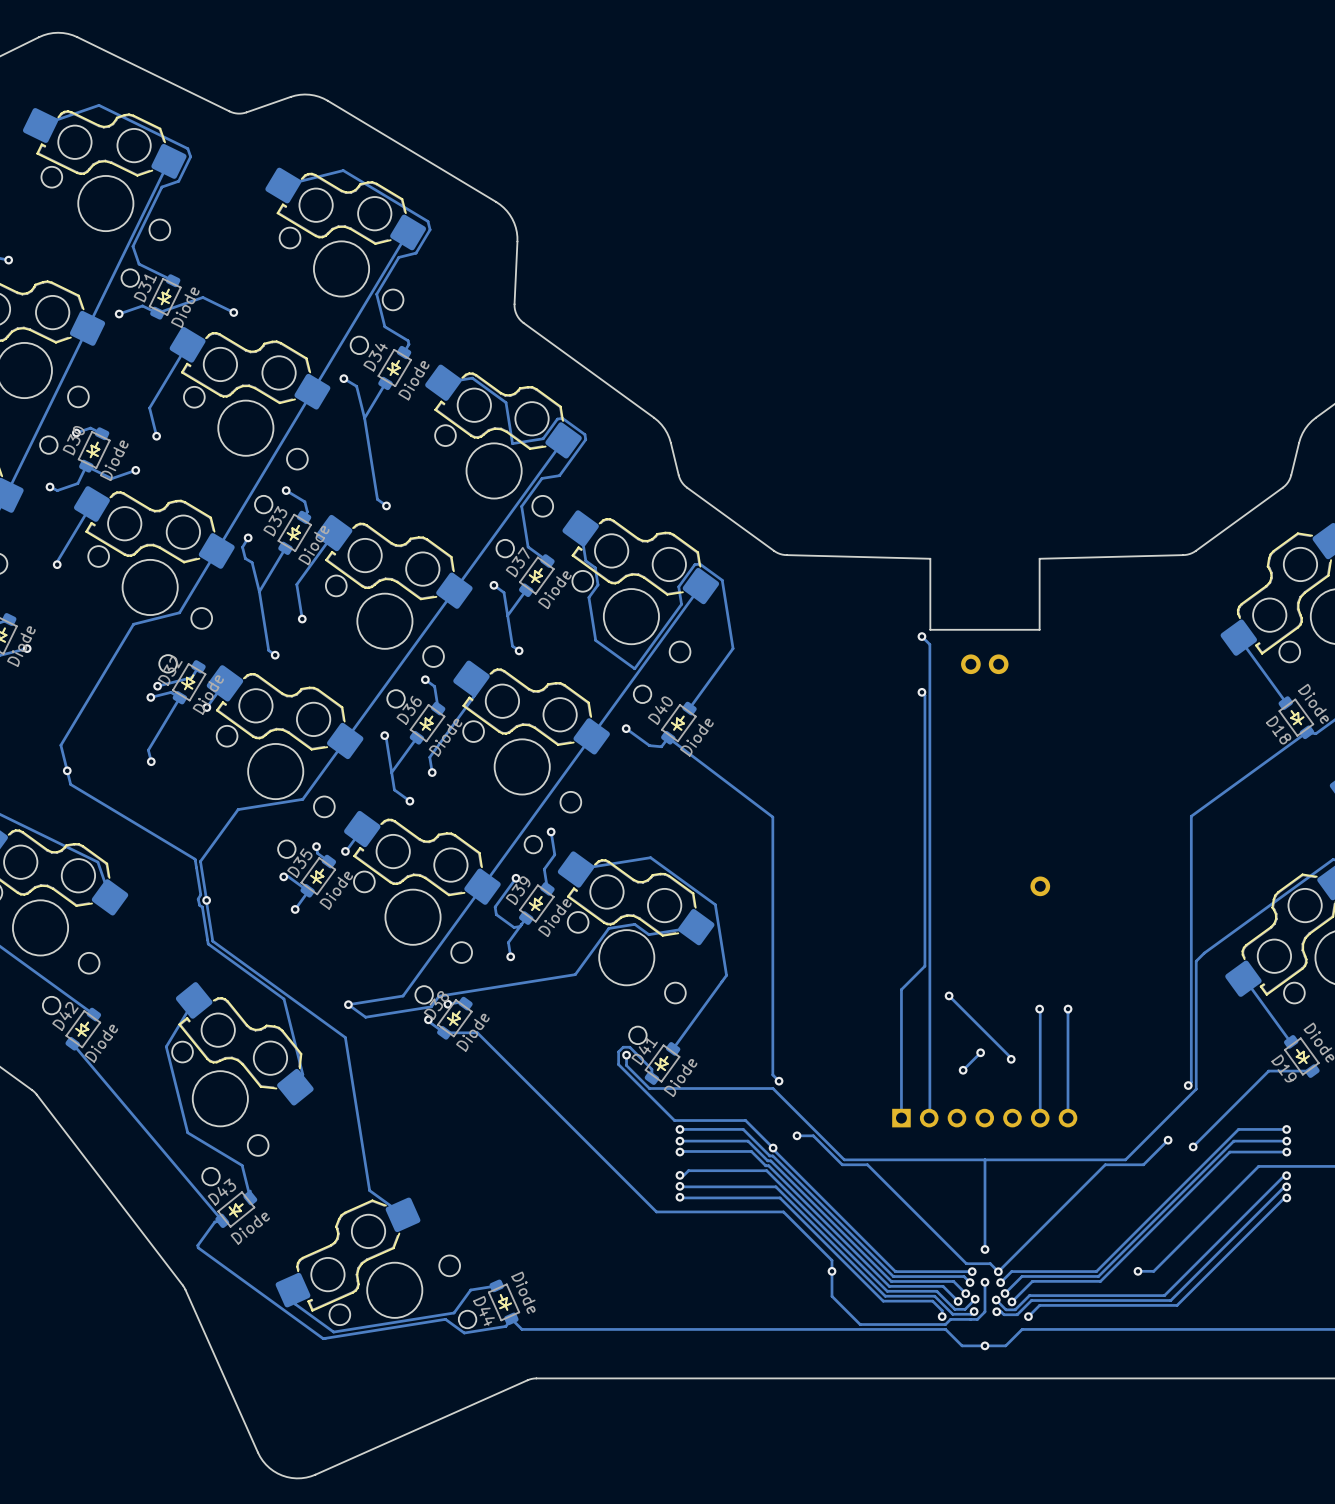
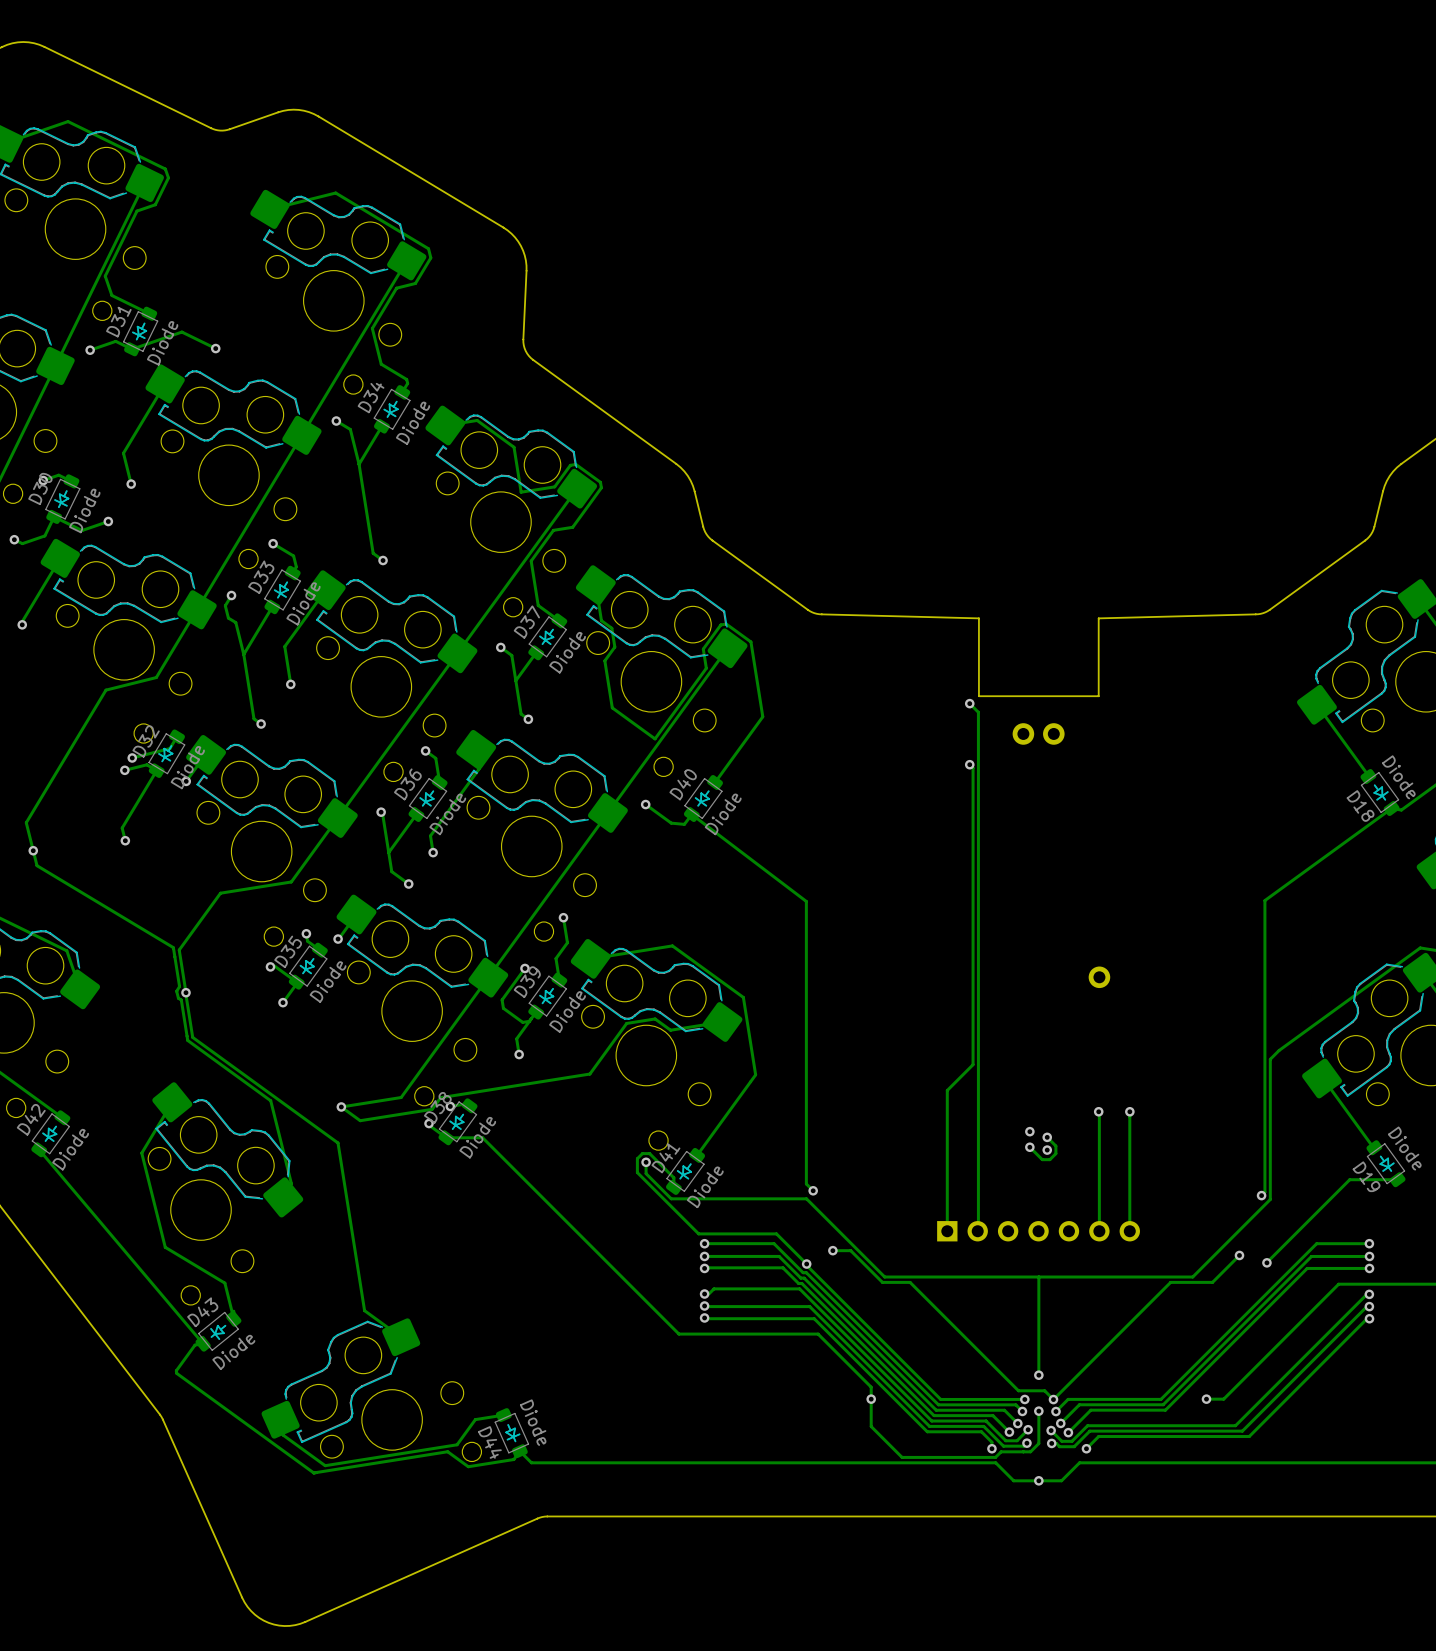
track: (949, 995) (1011, 1059) -> none
via: (949, 995) -> none
via: none -> (1029, 1131)
track: none -> (1047, 1137) (1055, 1146) (1055, 1153) (1049, 1159) (1042, 1159) (1029, 1147)
via: none -> (1047, 1137)
via: none -> (1029, 1147)
via: none -> (1047, 1150)
track: (980, 1052) (963, 1070) -> none
via: (980, 1052) -> none
via: (1011, 1059) -> none
via: (963, 1070) -> none

